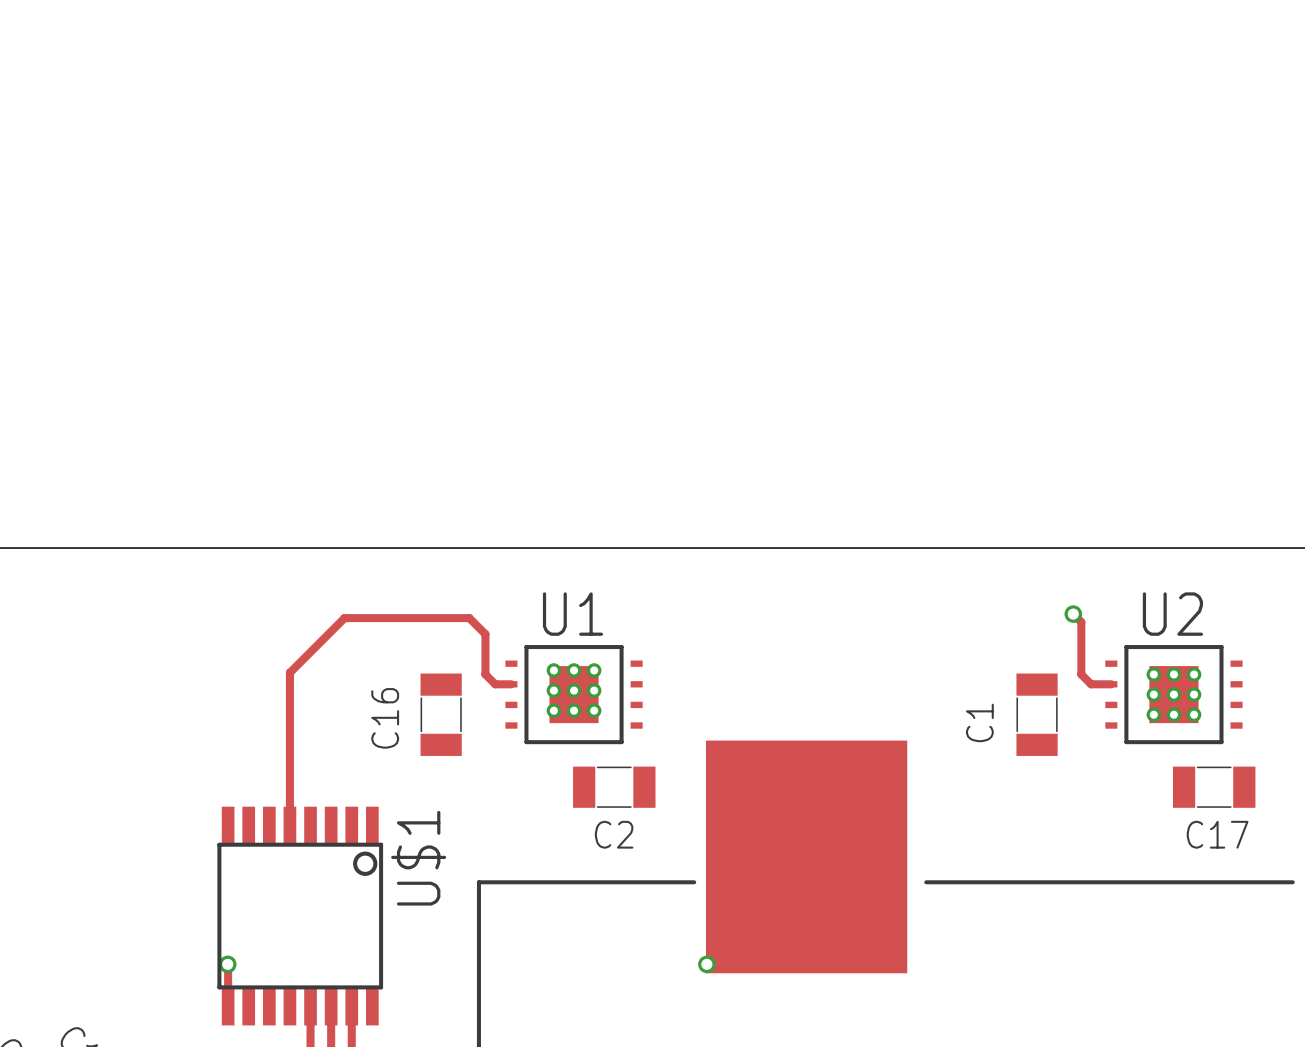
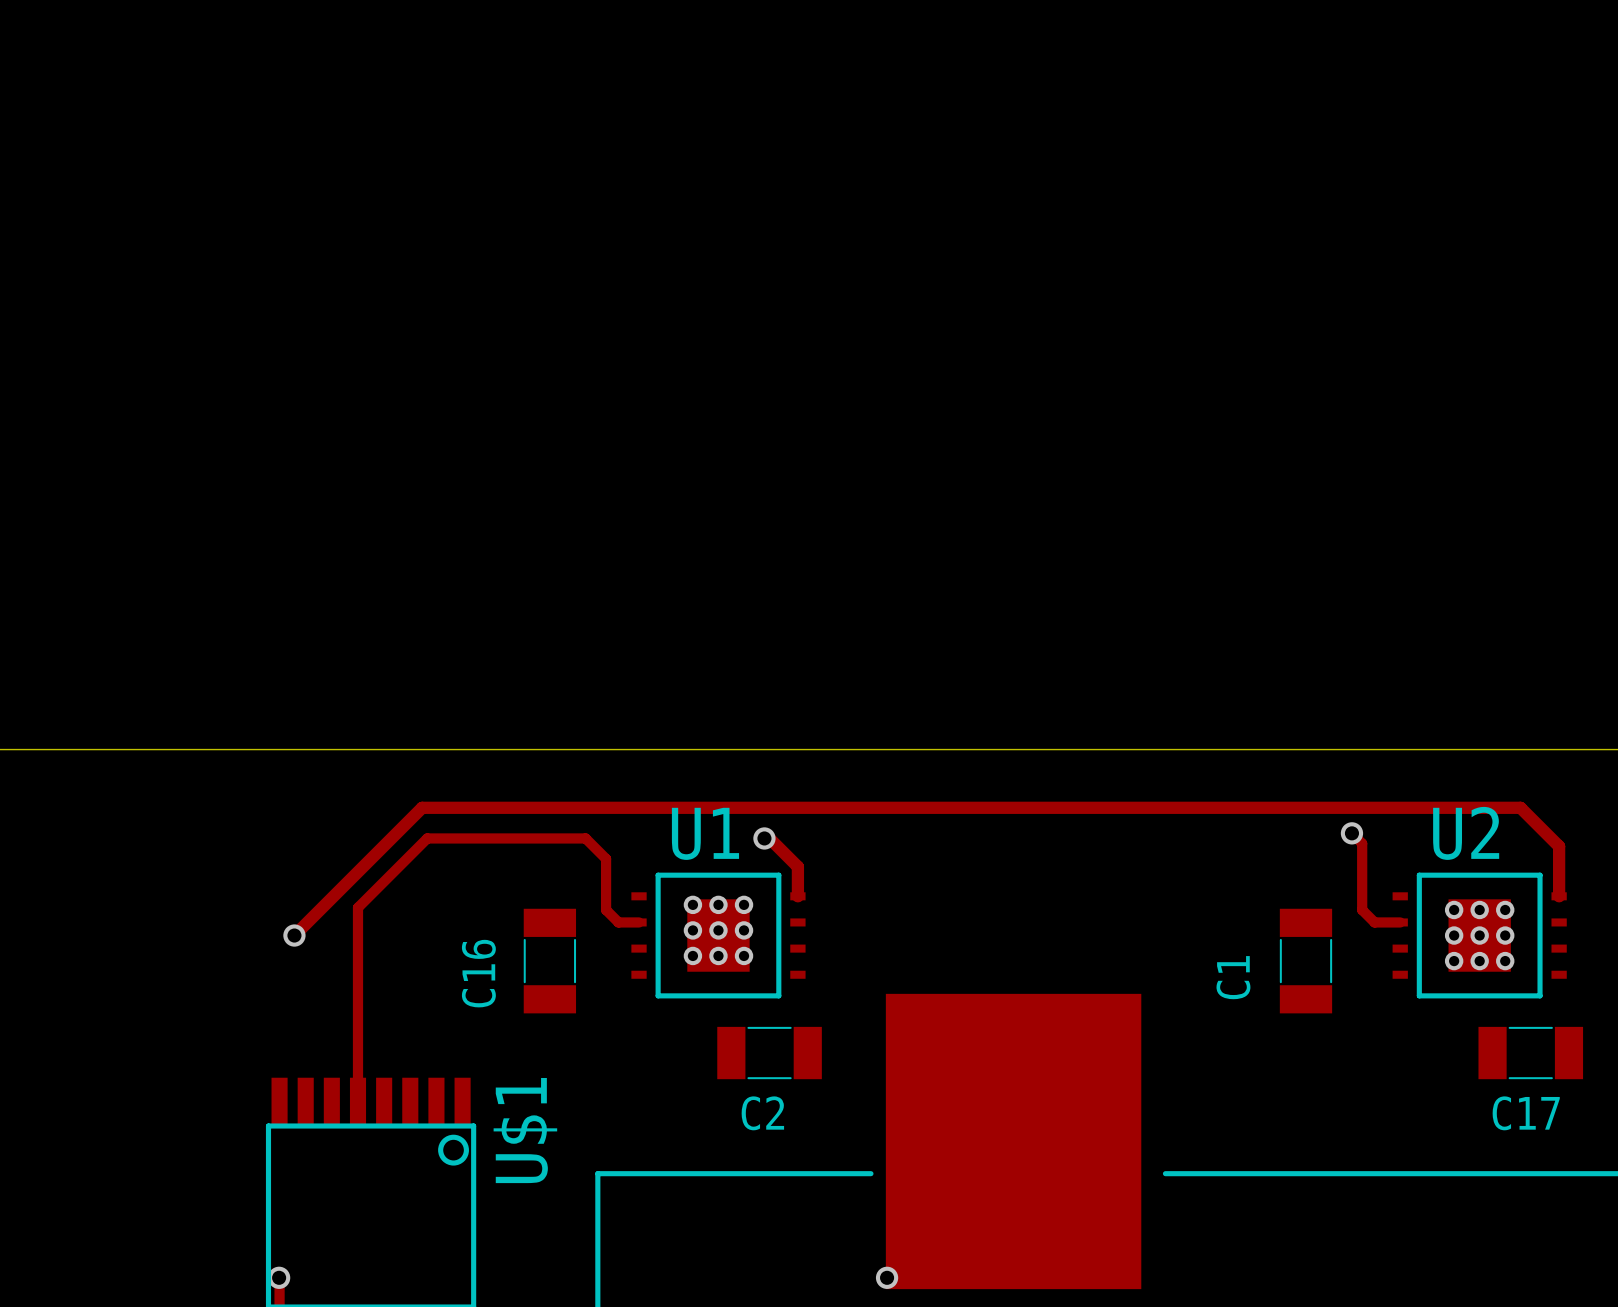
track: none -> (764, 838) (769, 838) (797, 866) (797, 896)
via: none -> (764, 838)
track: none -> (1559, 896) (1559, 846) (1520, 807) (422, 807) (294, 935)
via: none -> (294, 935)

